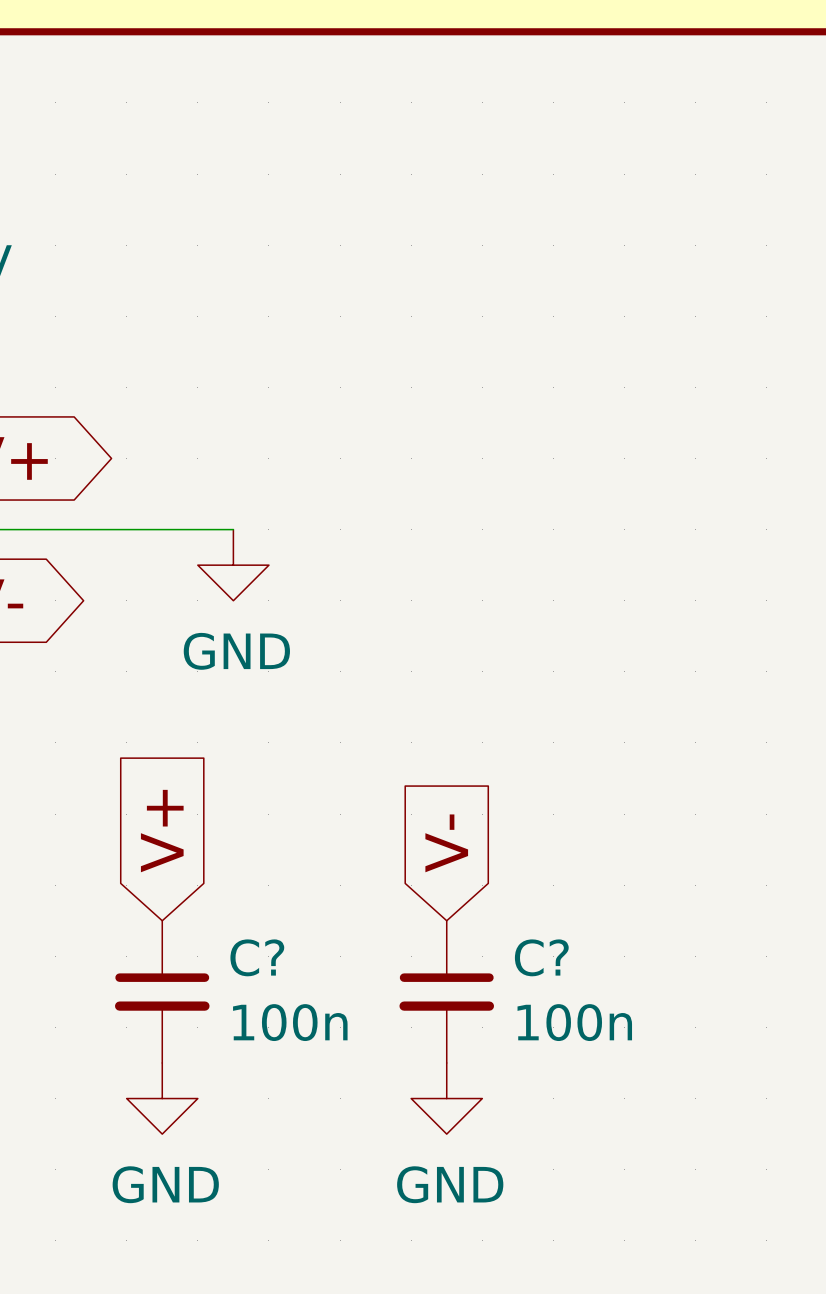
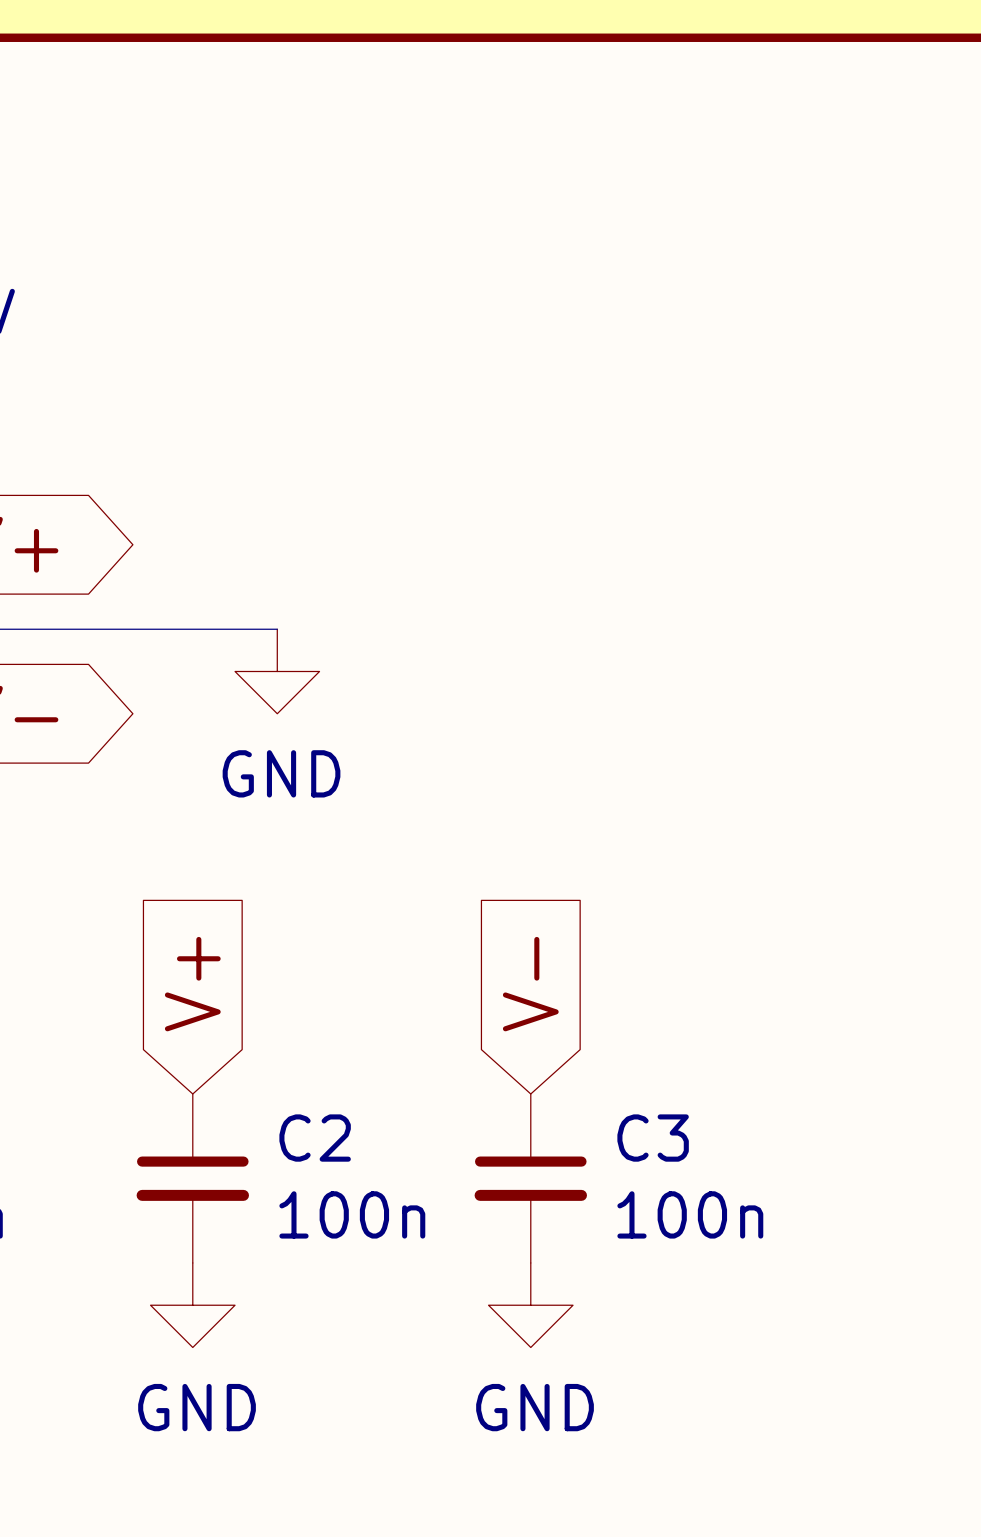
C? name: C? (257, 957) -> C2 (315, 1138)
C? name: C? (541, 957) -> C3 (653, 1138)

